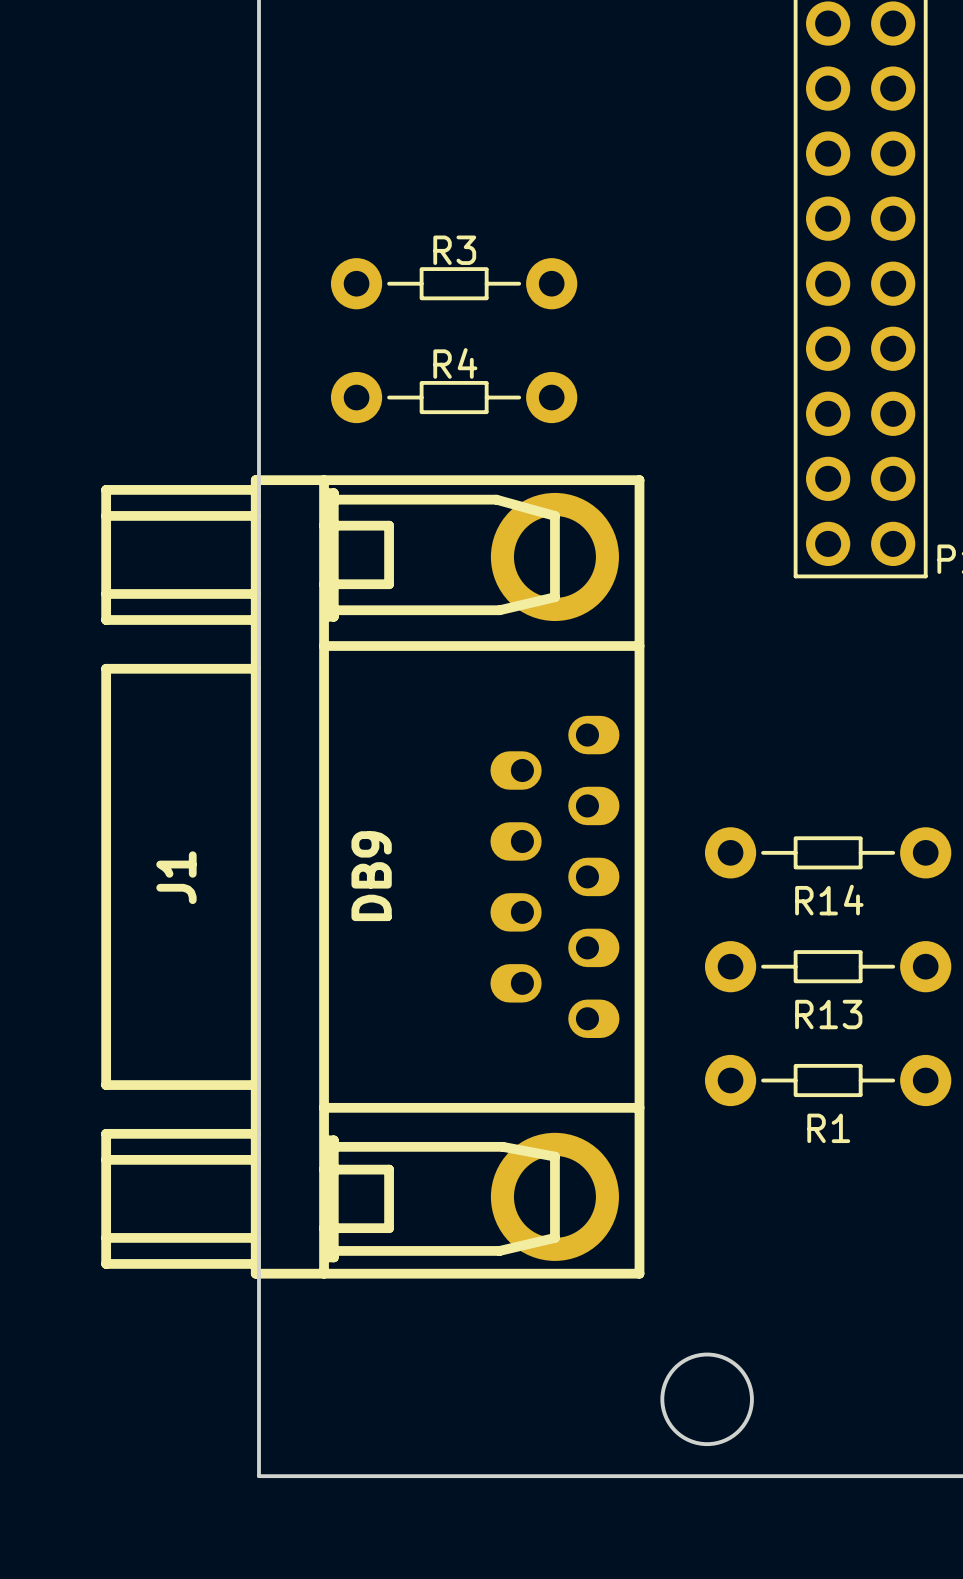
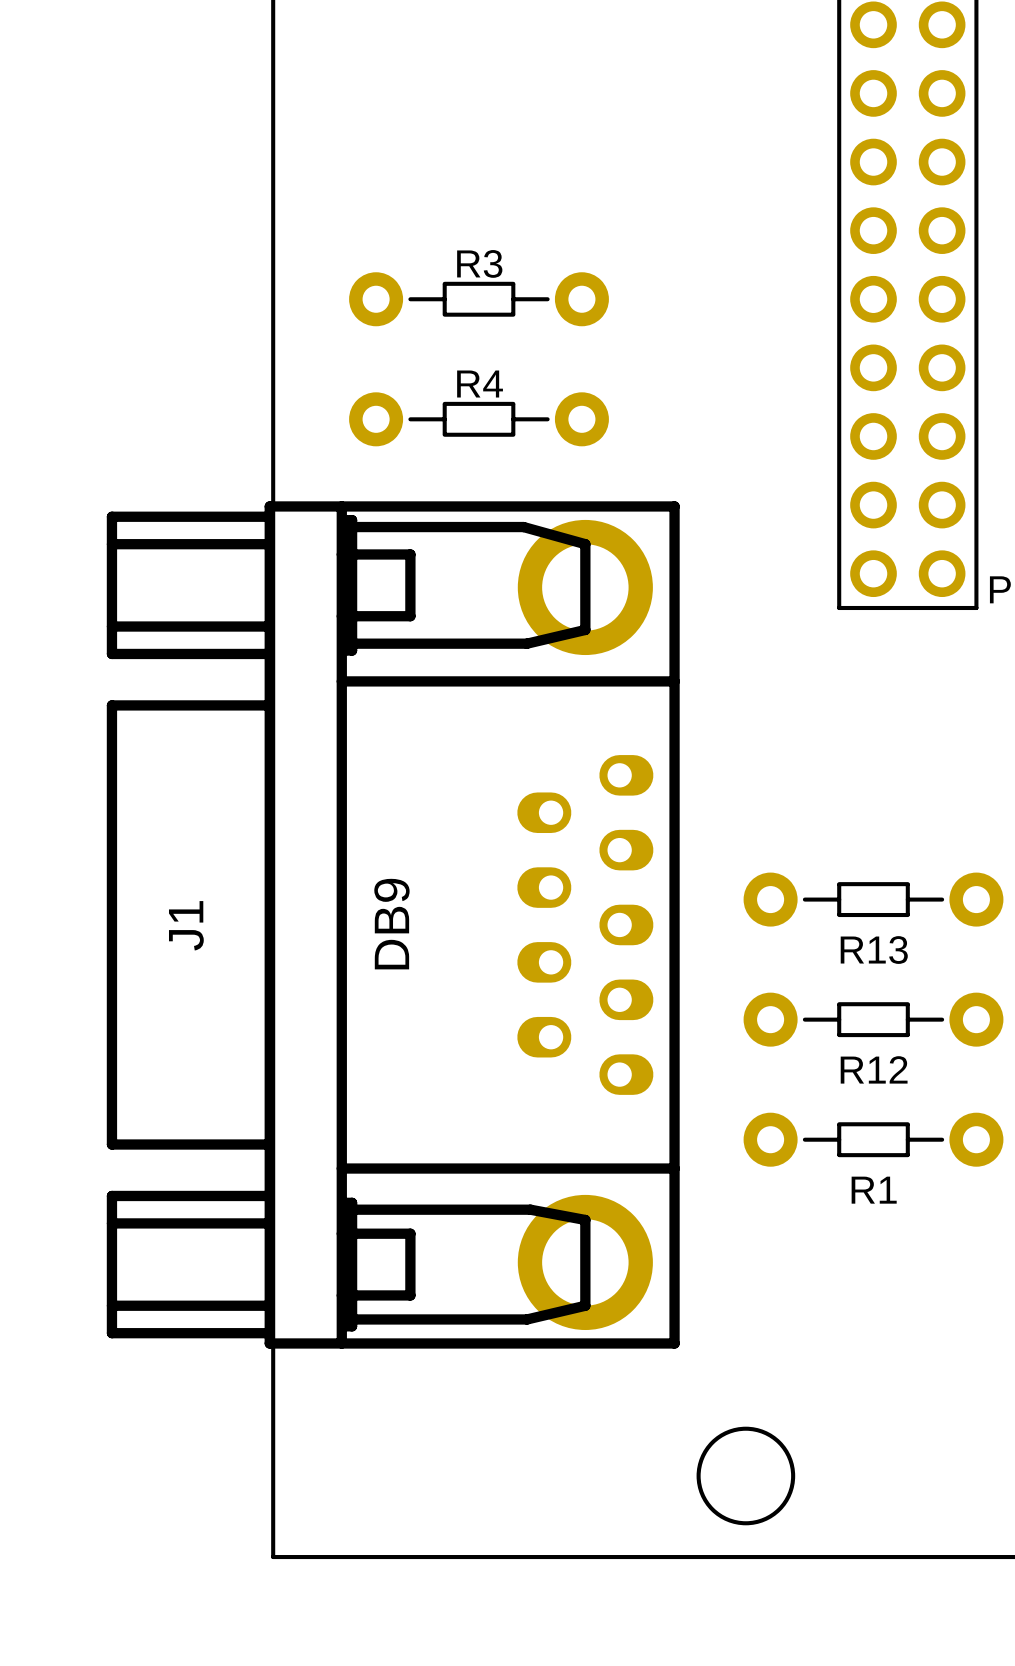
R14 name: R14 (829, 900) -> R13 (874, 950)
R13 name: R13 (828, 1014) -> R12 (874, 1069)

